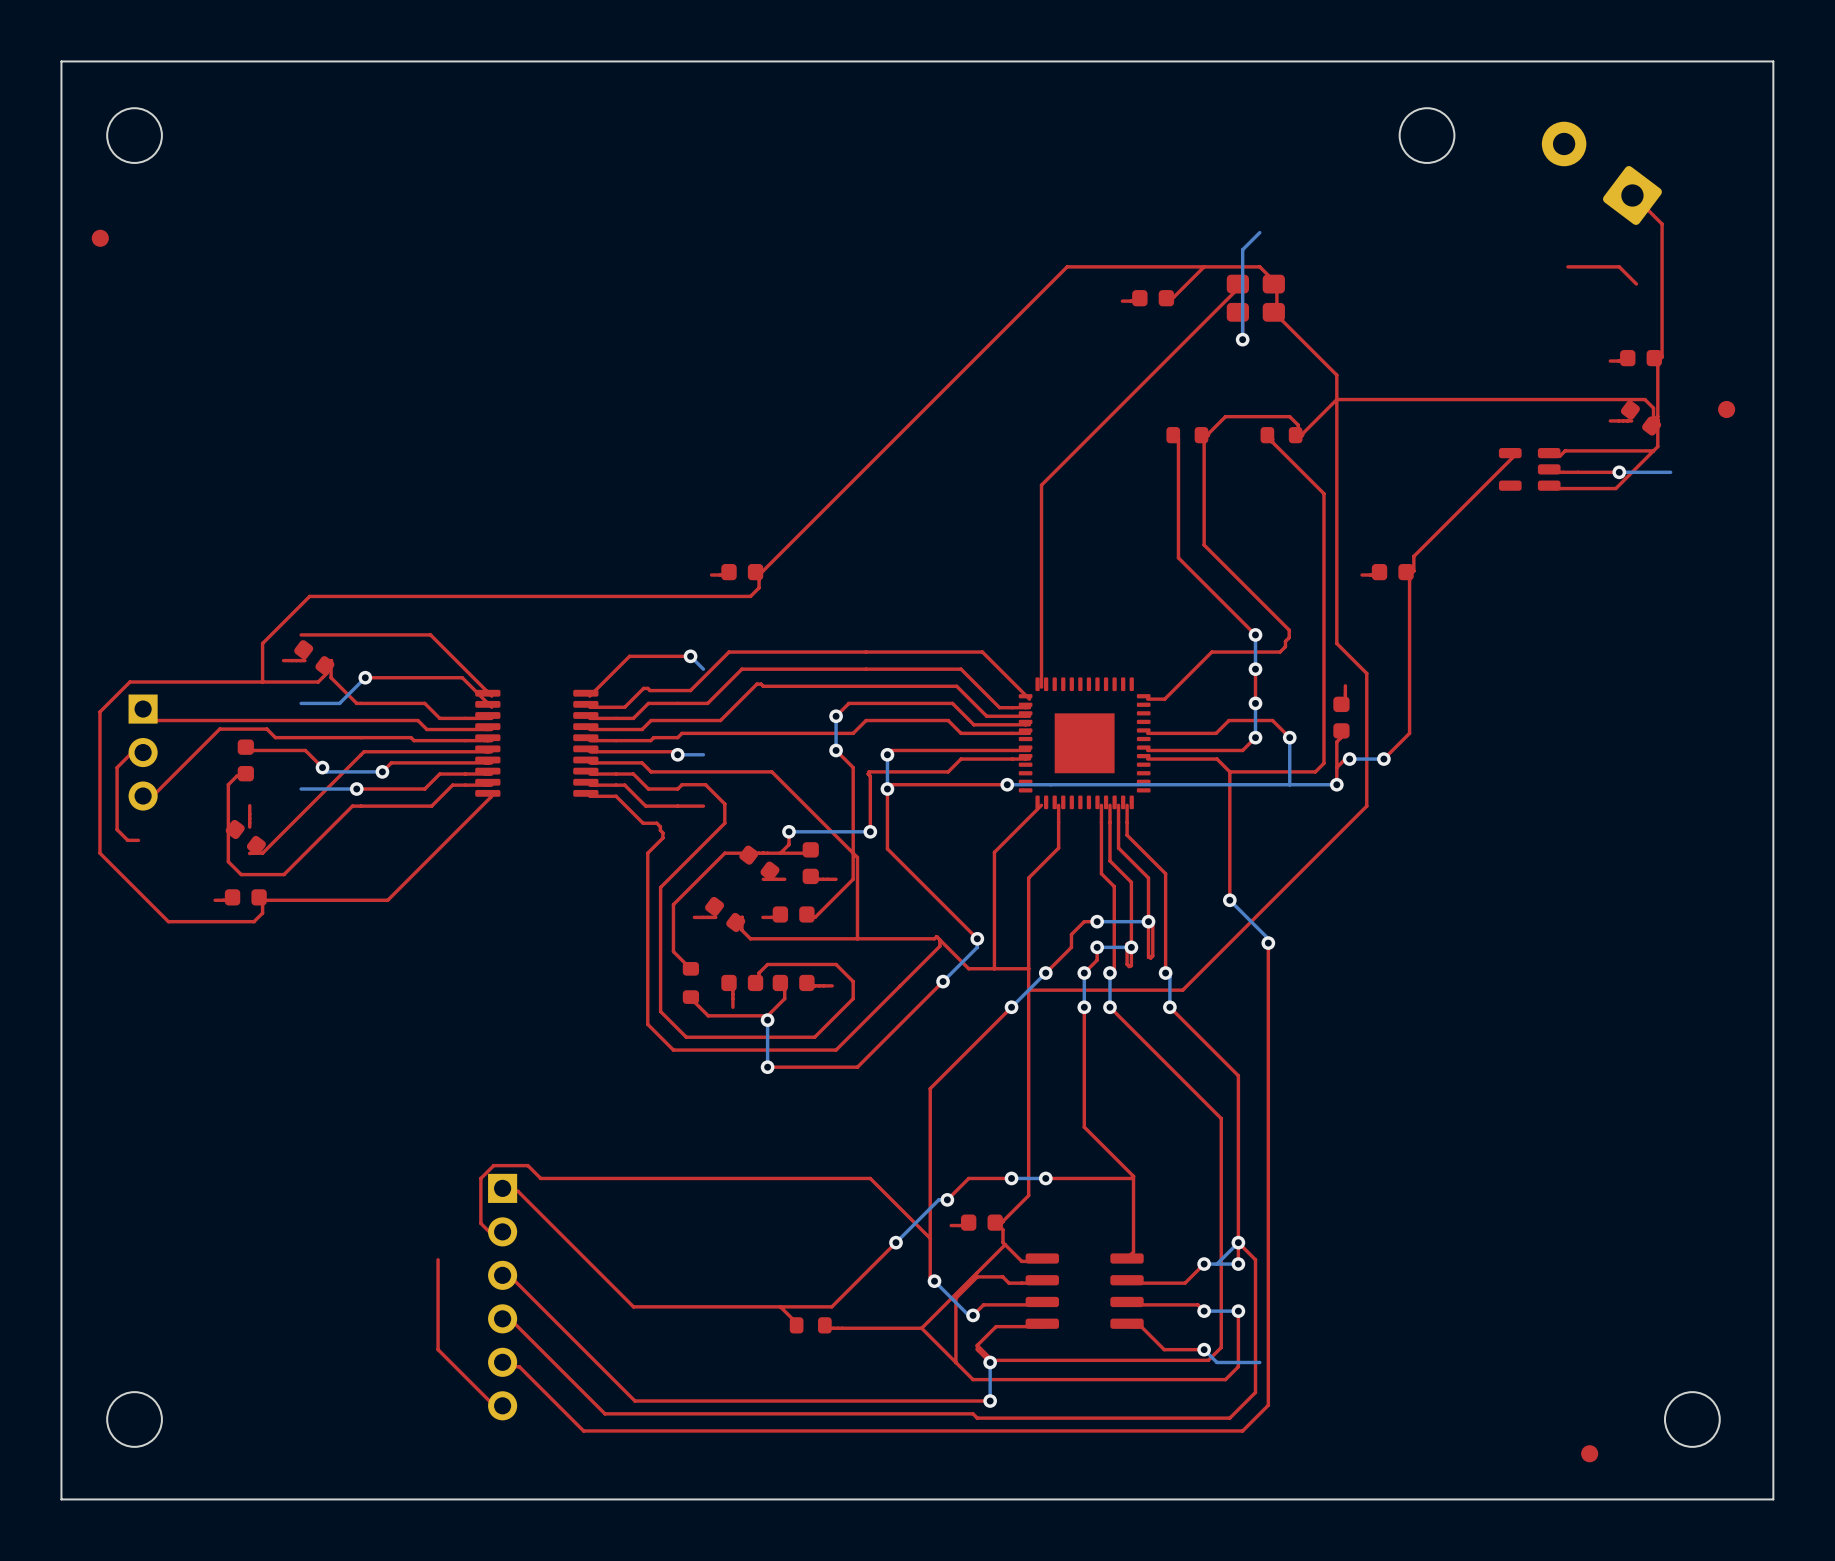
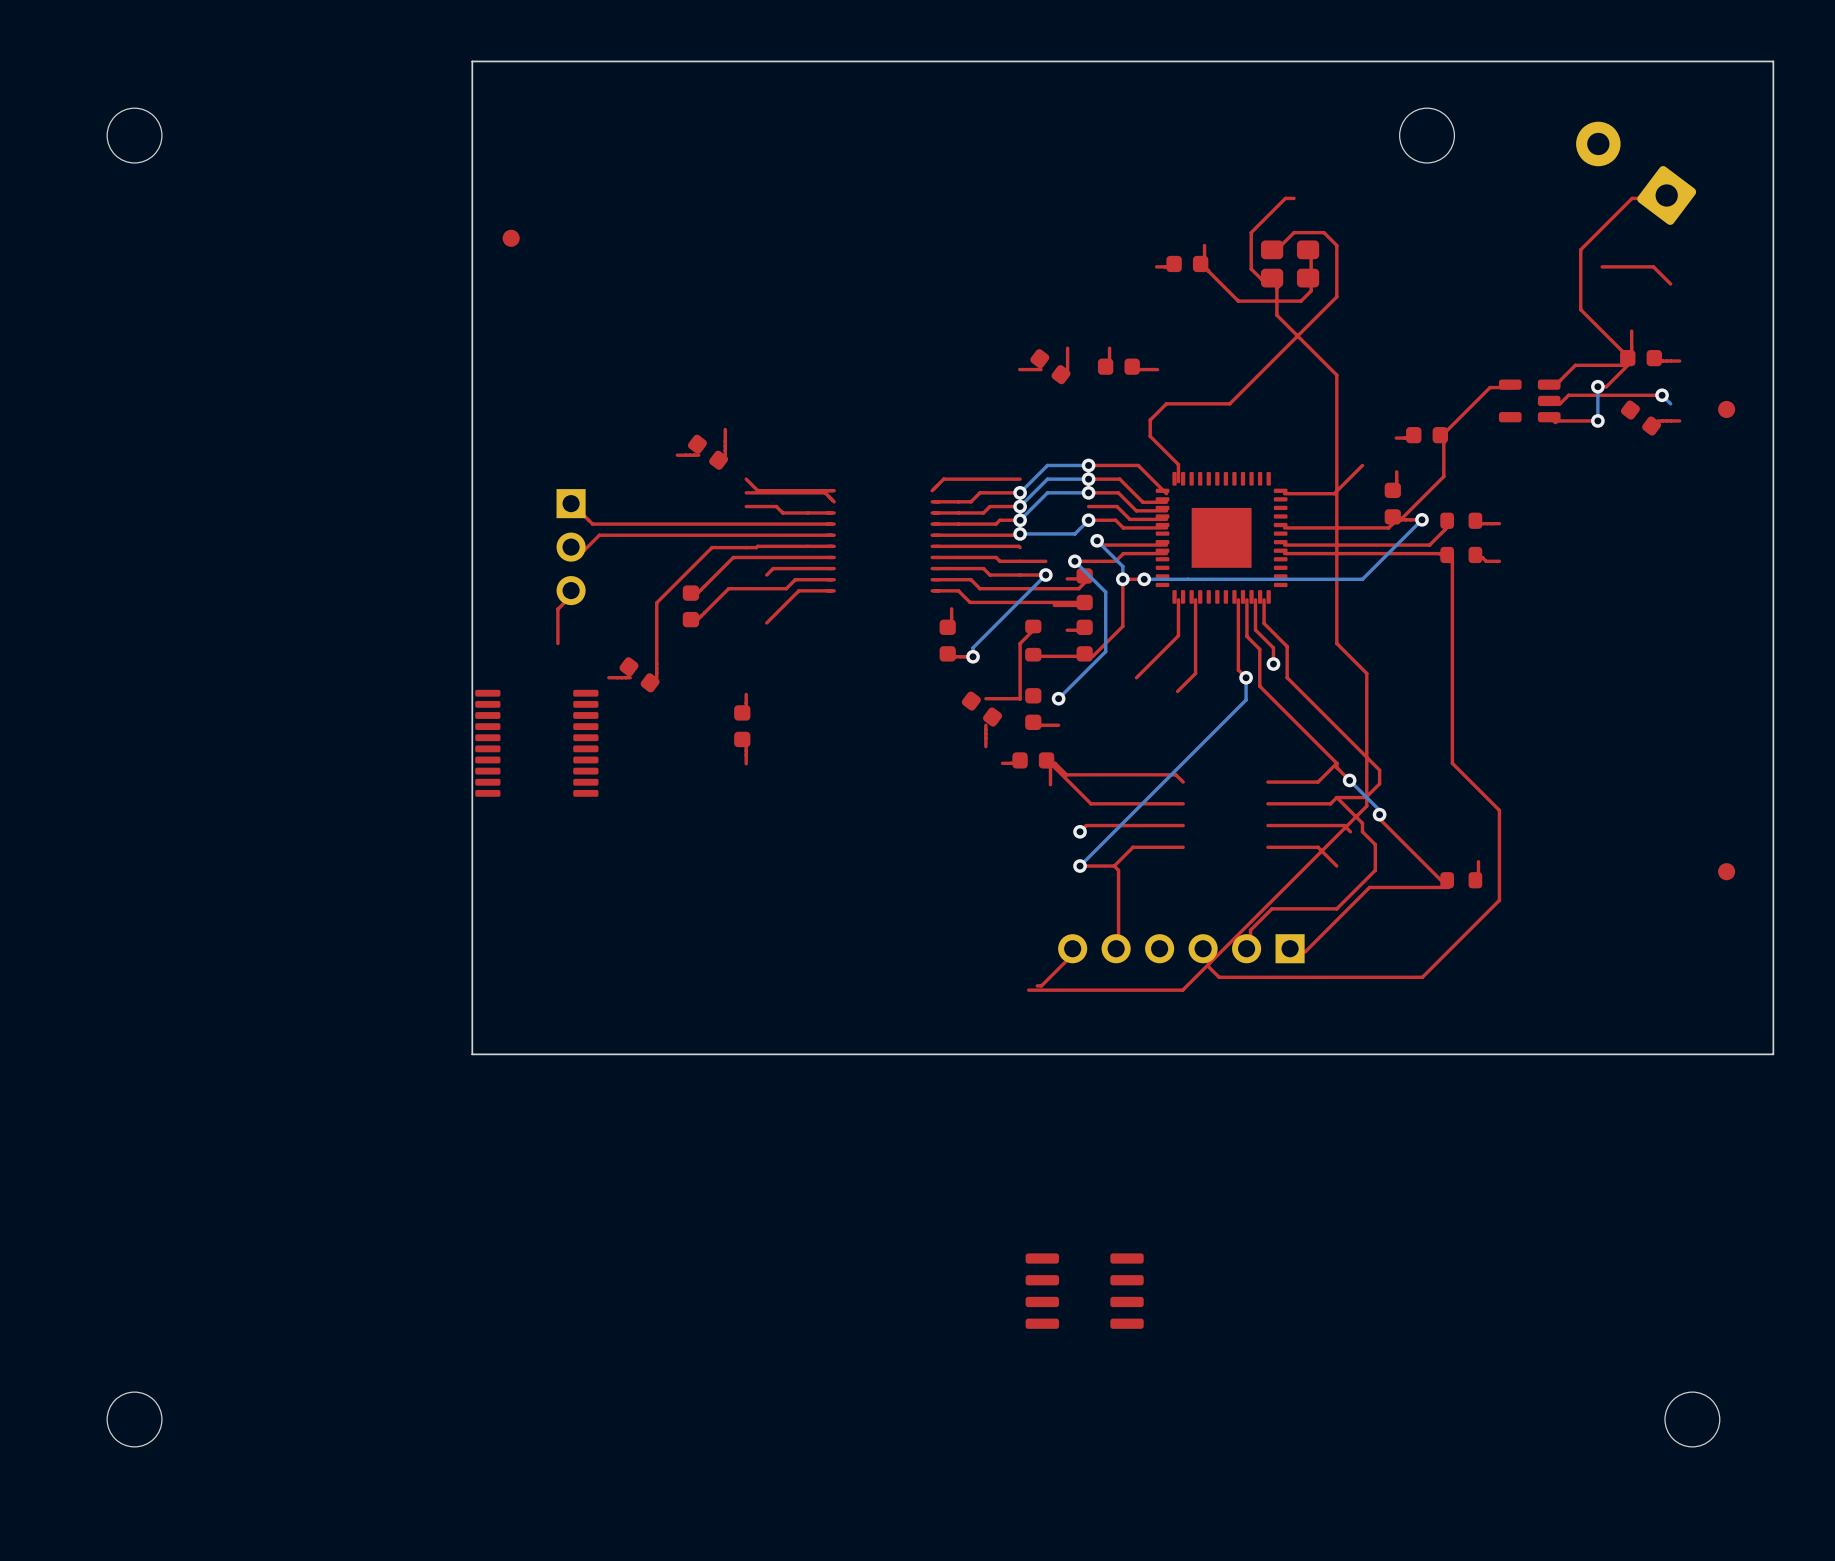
board edge: (472, 61) (61, 61) (61, 1499) (1773, 1499) (1773, 1054) -> (472, 61) (472, 1054) (1773, 1054)
part position: (1601, 173) -> (1636, 173)
top track: (1636, 198) (1662, 224) (1662, 357) (1658, 361) (1657, 365) (1658, 420) -> none
top track: none -> (1670, 198) (1632, 198) (1580, 249) (1580, 309) (1631, 361)
bottom track: (1259, 232) (1242, 249) (1242, 339) -> none
part position: (100, 238) -> (511, 238)
top track: none -> (1204, 245) (1204, 266) (1238, 301) (1301, 301) (1311, 291) (1311, 252)
part: none -> (1187, 263)
top track: (1156, 266) (1067, 266) (759, 574) (759, 587) (750, 596) (309, 596) (262, 643) (262, 682) -> none
top track: (1178, 266) (1259, 266) (1272, 279) -> (1294, 198) (1285, 198) (1251, 232) (1251, 269) (1261, 279) (1272, 279)
top track: (1204, 266) (1170, 301) -> none
top track: (1602, 266) (1567, 266) -> none
top track: (1619, 266) (1636, 283) -> (1619, 266) (1653, 266) (1670, 283)
top track: (1241, 286) (1239, 286) (1041, 485) (1041, 687) -> none
part: (1153, 298) -> none
part position: (1255, 298) -> (1290, 263)
top track: (1143, 301) (1122, 301) -> (1157, 369) (1136, 369)
top track: none -> (1631, 331) (1631, 361) (1606, 386) (1597, 386)
via: (1242, 339) -> none
top track: none -> (1067, 348) (1067, 369)
top track: none -> (1109, 348) (1109, 369)
top track: (1627, 361) (1610, 361) -> (1627, 361) (1623, 365) (1575, 365) (1553, 387)
part: none -> (1050, 366)
part: none -> (1118, 366)
top track: none -> (1041, 369) (1019, 369)
via: none -> (1597, 386)
top track: none -> (1514, 387) (1490, 387) (1443, 433) (1443, 476) (1401, 519) (1397, 519) (1388, 527) (1284, 527)
top track: none -> (1662, 395) (1568, 395) (1560, 403) (1553, 403)
bottom track: none -> (1662, 395) (1670, 403)
via: none -> (1662, 395)
top track: none -> (1553, 420) (1555, 422) (1557, 420) (1597, 420)
via: none -> (1597, 420)
top track: (1631, 420) (1610, 420) -> (1679, 361) (1658, 361)
top track: (1658, 420) (1657, 446) (1615, 488) (1553, 488) -> (1658, 420) (1679, 420)
top track: (1658, 420) (1653, 416) (1653, 408) (1644, 399) (1336, 399) (1301, 436) (1298, 433) (1298, 425) (1289, 416) (1225, 416) (1204, 439) (1204, 545) (1289, 630) (1289, 637) (1285, 641) (1285, 646) (1280, 652) (1211, 652) (1164, 699) (1147, 699) -> none
top track: none -> (725, 429) (725, 455)
part: (1187, 435) -> none
part: (1281, 435) -> none
part: none -> (1427, 435)
top track: (1177, 438) (1178, 464) -> (1276, 252) (1294, 232) (1323, 232) (1336, 245) (1336, 296) (1229, 403) (1166, 403) (1150, 420) (1150, 436) (1178, 464)
top track: (1271, 438) (1272, 442) (1323, 493) (1323, 763) (1315, 771) (1229, 771) -> none
top track: (1653, 450) (1565, 450) (1560, 456) (1553, 456) -> none
part: none -> (708, 452)
top track: (1514, 456) (1413, 556) (1413, 571) (1410, 575) (1409, 579) (1409, 733) (1383, 759) -> none
top track: none -> (1088, 465) (1138, 465) (1166, 493)
bottom track: none -> (1088, 465) (1047, 465) (1020, 492)
via: none -> (1088, 465)
top track: none -> (1362, 465) (1334, 493) (1284, 493)
part position: (1529, 469) -> (1529, 400)
top track: (1619, 472) (1553, 472) -> none
via: (1619, 472) -> none
bottom track: (1670, 472) (1619, 472) -> none
top track: none -> (746, 479) (757, 490) (834, 490)
top track: none -> (1020, 479) (943, 479) (932, 490)
top track: none -> (1088, 479) (1119, 479) (1142, 502) (1166, 502)
bottom track: none -> (1088, 479) (1047, 479) (1020, 506)
via: none -> (1088, 479)
top track: (1178, 481) (1178, 557) (1255, 634) -> none
top track: none -> (746, 492) (825, 492) (834, 501)
top track: none -> (1020, 492) (979, 492) (971, 501) (932, 501)
via: none -> (1020, 492)
top track: none -> (1088, 492) (1118, 492) (1136, 510) (1166, 510)
bottom track: none -> (1088, 492) (1047, 492) (1020, 520)
via: none -> (1088, 492)
top track: none -> (575, 506) (592, 524) (834, 524)
top track: none -> (746, 506) (776, 506) (782, 512) (834, 512)
top track: none -> (1020, 506) (989, 506) (983, 512) (932, 512)
via: none -> (1020, 506)
top track: none -> (1088, 506) (1117, 506) (1129, 519) (1166, 519)
top track: none -> (1421, 519) (1396, 519)
bottom track: none -> (1421, 519) (1362, 579) (1144, 579)
via: none -> (1421, 519)
top track: none -> (1020, 520) (999, 520) (996, 524) (932, 524)
via: none -> (1020, 520)
top track: none -> (1088, 520) (1115, 520) (1123, 527) (1166, 527)
bottom track: none -> (1088, 520) (1074, 533) (1020, 533)
via: none -> (1088, 520)
part: none -> (1461, 520)
top track: none -> (1451, 523) (1429, 545) (1284, 545)
top track: none -> (1499, 523) (1479, 523)
top track: none -> (1020, 533) (932, 535)
via: none -> (1020, 533)
top track: none -> (834, 535) (599, 535) (584, 550) (575, 550)
top track: none -> (1097, 540) (1101, 545) (1166, 545)
bottom track: none -> (1097, 540) (1122, 566) (1122, 579)
via: none -> (1097, 540)
top track: none -> (834, 546) (711, 547) (656, 602) (656, 677)
top track: none -> (932, 546) (1020, 547)
part: none -> (571, 547)
top track: none -> (1166, 553) (1123, 553) (1115, 561) (1074, 561)
top track: none -> (1284, 553) (1439, 553) (1447, 561) (1451, 557) (1452, 559) (1452, 763) (1499, 810) (1499, 900) (1422, 977) (1219, 977) (1208, 966) (1207, 951)
part: none -> (1461, 554)
top track: none -> (834, 557) (733, 557) (694, 595)
top track: none -> (932, 557) (996, 557) (999, 561) (1045, 561)
top track: none -> (1479, 557) (1482, 557) (1486, 561) (1499, 561)
bottom track: none -> (1074, 561) (1105, 592) (1105, 651) (1058, 698)
via: none -> (1074, 561)
top track: none -> (834, 568) (773, 568) (766, 575)
top track: none -> (932, 568) (983, 568) (989, 575) (1045, 575)
part rotation: 0° (742, 572) -> 90° clockwise (690, 606)
part position: (742, 572) -> (690, 606)
part rotation: 0° (1392, 572) -> 90° clockwise (1392, 503)
part position: (1392, 572) -> (1392, 503)
top track: (732, 575) (711, 575) -> (698, 455) (677, 455)
bottom track: none -> (1045, 575) (973, 647) (973, 656)
via: none -> (1045, 575)
top track: (1383, 575) (1362, 575) -> (1417, 438) (1396, 438)
top track: none -> (1067, 578) (1084, 578) (1086, 580) (1078, 588) (979, 588) (971, 579) (932, 579)
top track: none -> (834, 579) (795, 579) (786, 588) (728, 588) (694, 622)
via: none -> (1122, 579)
top track: none -> (1144, 579) (1122, 579) (1122, 626) (1092, 656) (1037, 657)
via: none -> (1144, 579)
part: none -> (1084, 589)
top track: none -> (834, 590) (798, 590) (766, 622)
top track: none -> (932, 590) (958, 590) (970, 602) (1085, 602) (1085, 605) (1054, 605)
top track: none -> (575, 593) (557, 609) (557, 643)
top track: none -> (1178, 599) (1178, 635) (1136, 677)
top track: none -> (1195, 599) (1195, 673) (1177, 691)
top track: none -> (1238, 599) (1238, 670) (1246, 677)
top track: none -> (1246, 599) (1246, 636) (1259, 649) (1259, 686) (1336, 763) (1318, 782) (1267, 782)
top track: none -> (1255, 599) (1255, 629) (1273, 647) (1273, 664)
top track: none -> (1264, 599) (1264, 623) (1287, 646) (1287, 677) (1379, 770) (1379, 783) (1365, 797) (1336, 797)
top track: none -> (951, 608) (951, 630)
top track: none -> (1037, 629) (1034, 629) (1020, 643) (1020, 699) (985, 698)
top track: none -> (1088, 630) (1067, 630)
top track: (301, 634) (430, 634) (491, 696) -> none
bottom track: (1255, 634) (1255, 669) -> (1597, 386) (1597, 420)
via: (1255, 634) -> none
part: none -> (947, 640)
part: none -> (1033, 640)
part: none -> (1084, 640)
top track: (690, 656) (629, 656) (589, 696) -> none
bottom track: (690, 656) (703, 669) -> none
via: (690, 656) -> none
via: none -> (973, 656)
part: (314, 657) -> none
top track: (304, 660) (283, 660) -> none
via: none -> (1273, 664)
top track: (1255, 669) (1255, 703) -> none
via position: (1255, 669) -> (1246, 677)
part: none -> (639, 674)
top track: (365, 677) (462, 677) (491, 707) -> none
bottom track: (365, 677) (339, 703) (301, 703) -> none
via: (365, 677) -> none
bottom track: none -> (1246, 677) (1246, 699) (1080, 866)
top track: (1345, 685) (1345, 707) -> (1396, 471) (1396, 493)
top track: none -> (746, 694) (746, 715)
via: none -> (1058, 698)
top track: (1029, 699) (982, 652) (729, 652) (690, 690) (650, 690) (643, 688) (624, 707) (589, 707) -> none
bottom track: (1255, 703) (1255, 737) -> none
via: (1255, 703) -> none
top track: (1029, 707) (999, 707) (961, 669) (741, 669) (707, 703) (648, 703) (633, 718) (589, 718) -> none
part: none -> (981, 709)
part: none -> (1033, 709)
top track: (147, 711) (155, 720) (417, 720) (426, 729) (491, 729) -> none
top track: (836, 716) (848, 703) (952, 703) (973, 724) (1029, 724) -> none
bottom track: (836, 716) (836, 750) -> none
via: (836, 716) -> none
top track: (1029, 716) (986, 716) (956, 686) (763, 686) (756, 684) (720, 720) (651, 720) (642, 729) (589, 729) -> none
part: (1341, 717) -> none
top track: (491, 718) (439, 718) (424, 703) (356, 703) (331, 677) (331, 660) (326, 664) (326, 673) (318, 682) (129, 682) (99, 711) (99, 853) (168, 921) (254, 921) (262, 913) (263, 900) (387, 900) (491, 796) -> none
top track: none -> (985, 725) (985, 746)
part: none -> (742, 726)
top track: (1029, 733) (961, 733) (948, 720) (866, 720) (853, 733) (682, 733) (677, 737) (653, 737) (650, 740) (589, 740) -> none
top track: (1147, 733) (1216, 733) (1228, 720) (1272, 720) (1289, 737) -> none
top track: (1345, 733) (1336, 741) (1336, 763) -> none
top track: (1255, 737) (1242, 750) (1147, 750) -> none
via: (1255, 737) -> none
bottom track: (1289, 737) (1289, 784) -> none
via: (1289, 737) -> none
top track: (491, 740) (414, 740) (411, 737) (275, 737) (266, 729) (219, 729) (151, 797) (147, 798) -> none
part position: (1084, 743) -> (1221, 537)
top track: (249, 750) (305, 750) (322, 767) -> none
top track: (836, 750) (853, 767) (853, 879) (815, 917) (810, 917) -> none
via: (836, 750) -> none
top track: (1029, 750) (891, 750) (887, 754) -> none
top track: (491, 751) (364, 751) (262, 853) (249, 853) -> none
top track: (589, 751) (674, 751) (677, 754) -> none
part: (143, 752) -> none
via: (677, 754) -> none
bottom track: (703, 754) (677, 754) -> none
bottom track: (887, 754) (887, 789) -> none
via: (887, 754) -> none
top track: (147, 755) (129, 754) (117, 767) (117, 829) (127, 840) (138, 840) -> none
top track: (1029, 759) (961, 759) (948, 771) (869, 771) (870, 831) -> none
top track: (1147, 759) (1216, 759) (1229, 771) -> none
top track: (1349, 759) (1345, 759) (1336, 767) (1336, 784) -> none
via: (1349, 759) -> none
bottom track: (1383, 759) (1349, 759) -> none
via: (1383, 759) -> none
part: (245, 760) -> none
part: none -> (1033, 760)
top track: (491, 762) (391, 762) (382, 771) -> none
top track: (589, 762) (642, 762) (651, 771) (771, 771) (857, 857) (857, 938) -> none
top track: none -> (1050, 763) (1055, 763) (1066, 774) (1175, 774) (1183, 782)
top track: none -> (1050, 763) (1050, 784)
top track: none -> (1050, 763) (1090, 803) (1183, 803)
bottom track: (322, 767) (326, 771) (382, 771) -> none
via: (322, 767) -> none
top track: none -> (1336, 767) (1349, 780)
via: (382, 771) -> none
top track: (1229, 771) (1229, 900) -> none
top track: (491, 774) (439, 774) (424, 789) (356, 789) -> none
top track: (589, 774) (633, 774) (648, 789) (677, 789) (682, 784) (705, 784) (724, 803) (724, 823) (660, 887) (660, 1011) (686, 1037) (814, 1037) (853, 998) (853, 981) (836, 964) (767, 964) (759, 973) (759, 985) -> none
top track: (249, 776) (236, 776) (228, 784) (228, 861) (241, 874) (283, 874) (352, 806) (431, 806) (452, 785) (491, 785) -> none
bottom track: none -> (1349, 780) (1379, 810) (1379, 814)
top track: (1007, 784) (891, 784) (887, 789) (887, 848) (977, 938) -> none
via: (1007, 784) -> none
bottom track: (1336, 784) (1007, 784) -> none
via position: (1336, 784) -> (1349, 780)
top track: (589, 785) (624, 785) (645, 806) (703, 806) -> none
bottom track: (356, 789) (301, 789) -> none
via: (356, 789) -> none
via: (887, 789) -> none
top track: (589, 796) (616, 796) (643, 823) (656, 823) (662, 832) (662, 838) (647, 853) (647, 1024) (673, 1050) (836, 1050) (939, 946) (939, 939) -> none
top track: none -> (1336, 797) (1362, 823) (1362, 831) (1375, 844) (1375, 870) (1336, 908) (1271, 908) (1250, 930) (1250, 951)
top track: none -> (1336, 797) (1330, 803) (1267, 803)
top track: (249, 805) (249, 827) -> none
top track: (1041, 805) (994, 852) (994, 968) -> none
top track: (1058, 805) (1058, 848) (1028, 878) (1028, 1195) (999, 1225) -> none
top track: (1101, 805) (1101, 873) (1114, 886) (1114, 968) (1109, 973) -> none
top track: (1109, 805) (1109, 860) (1131, 882) (1131, 965) (1129, 966) (1127, 964) (1127, 943) (1127, 943) (1131, 947) -> none
top track: (1118, 805) (1118, 848) (1148, 878) (1148, 957) (1150, 958) (1152, 955) (1152, 921) (1148, 921) -> none
top track: (1127, 805) (1127, 835) (1165, 873) (1165, 973) -> none
top track: none -> (1379, 814) (1379, 818) (1448, 887)
via: none -> (1379, 814)
top track: none -> (1183, 825) (1086, 825) (1080, 831)
top track: none -> (1267, 825) (1344, 825) (1350, 831)
top track: (789, 831) (789, 844) (780, 853) -> none
via: (789, 831) -> none
bottom track: (870, 831) (789, 831) -> none
via: (870, 831) -> none
via: none -> (1080, 831)
part: (245, 837) -> none
top track: none -> (1183, 847) (1133, 847) (1114, 866)
top track: none -> (1267, 847) (1318, 847) (1336, 866)
top track: (814, 852) (724, 853) (673, 904) (673, 951) (694, 971) -> none
top track: none -> (1478, 861) (1479, 883)
part: (759, 863) -> none
part: (810, 863) -> none
via: none -> (1080, 866)
top track: none -> (1114, 866) (1080, 866)
top track: none -> (1114, 866) (1118, 870) (1118, 950) (1120, 951)
part: none -> (1726, 871)
top track: (784, 879) (763, 879) -> (630, 677) (608, 677)
top track: (836, 879) (814, 879) -> (1023, 763) (1002, 763)
part: none -> (1461, 880)
top track: none -> (1448, 887) (1369, 887) (1305, 951) (1294, 951)
part: (245, 897) -> none
top track: (236, 900) (215, 900) -> none
bottom track: (1229, 900) (1268, 938) (1268, 943) -> none
via: (1229, 900) -> none
part: (725, 914) -> none
part: (793, 914) -> none
top track: (715, 917) (694, 917) -> none
top track: (784, 917) (762, 917) -> (973, 656) (951, 656)
top track: (737, 921) (742, 917) (741, 930) (750, 938) (934, 938) (936, 936) (968, 968) (1028, 968) -> none
top track: (1097, 921) (1084, 921) (1071, 934) (1071, 947) (1045, 973) -> none
via: (1097, 921) -> none
bottom track: (1148, 921) (1097, 921) -> none
via: (1148, 921) -> none
bottom track: (977, 938) (977, 947) (943, 981) -> none
via: (977, 938) -> none
top track: (1268, 943) (1268, 1405) (1242, 1430) (583, 1430) (519, 1366) (506, 1365) -> none
via: (1268, 943) -> none
top track: (1097, 947) (1097, 960) (1084, 973) -> none
via: (1097, 947) -> none
bottom track: (1131, 947) (1097, 947) -> none
via: (1131, 947) -> none
part: none -> (1181, 948)
top track: none -> (1076, 951) (1041, 985) (1037, 985)
bottom track: (1045, 973) (1011, 1007) -> none
via: (1045, 973) -> none
bottom track: (1084, 973) (1084, 1007) -> none
via: (1084, 973) -> none
bottom track: (1109, 973) (1109, 1007) -> none
via: (1109, 973) -> none
bottom track: (1165, 973) (1169, 977) (1169, 1007) -> none
via: (1165, 973) -> none
top track: (943, 981) (857, 1067) (767, 1067) -> none
via: (943, 981) -> none
part: (690, 982) -> none
part: (742, 982) -> none
part: (793, 982) -> none
top track: (732, 985) (732, 1007) -> (746, 742) (746, 763)
top track: (784, 985) (784, 998) (767, 1015) -> none
top track: (832, 985) (810, 985) -> (1058, 725) (1037, 725)
top track: (694, 1000) (694, 1002) (708, 1015) (767, 1015) -> none
top track: (1011, 1007) (930, 1088) (930, 1276) (934, 1281) -> none
via: (1011, 1007) -> none
top track: (1084, 1007) (1084, 1127) (1133, 1176) -> none
via: (1084, 1007) -> none
top track: (1109, 1007) (1221, 1118) (1221, 1347) (1208, 1360) (992, 1360) (977, 1345) -> none
via: (1109, 1007) -> none
top track: (1169, 1007) (1238, 1075) (1238, 1264) -> none
via: (1169, 1007) -> none
bottom track: (767, 1020) (767, 1067) -> none
via: (767, 1020) -> none
via: (767, 1067) -> none
top track: (1133, 1176) (1131, 1178) (1045, 1178) -> none
top track: (1133, 1176) (1133, 1251) (1130, 1254) (1130, 1261) -> none
top track: (1011, 1178) (968, 1178) (947, 1199) -> none
via: (1011, 1178) -> none
bottom track: (1045, 1178) (1011, 1178) -> none
via: (1045, 1178) -> none
top track: (506, 1191) (517, 1191) (633, 1306) (831, 1306) (896, 1242) -> none
bottom track: (947, 1199) (938, 1199) (896, 1242) -> none
via: (947, 1199) -> none
top track: (998, 1221) (999, 1225) (1002, 1229) (1002, 1242) (1021, 1261) (1046, 1261) -> none
part: (981, 1222) -> none
top track: (972, 1225) (951, 1225) -> none
top track: (506, 1234) (491, 1234) (480, 1223) (480, 1178) (493, 1165) (527, 1165) (540, 1178) (870, 1178) (930, 1238) -> none
via: (896, 1242) -> none
top track: (1238, 1242) (1255, 1259) (1255, 1392) (1229, 1418) (977, 1418) (973, 1413) (604, 1413) (510, 1319) (506, 1321) -> none
bottom track: (1238, 1242) (1216, 1264) -> none
via: (1238, 1242) -> none
top track: (1005, 1244) (921, 1328) -> none
top track: (438, 1259) (438, 1349) (497, 1409) (506, 1408) -> none
top track: (1204, 1264) (1185, 1283) (1130, 1283) -> none
via: (1204, 1264) -> none
bottom track: (1238, 1264) (1204, 1264) -> none
via: (1238, 1264) -> none
top track: (506, 1278) (510, 1276) (634, 1401) (990, 1401) -> none
bottom track: (934, 1281) (968, 1315) (973, 1315) -> none
via: (934, 1281) -> none
top track: (1046, 1283) (1008, 1283) (1002, 1276) (977, 1276) (955, 1298) (955, 1362) -> none
part: (502, 1297) -> none
top track: (1046, 1304) (983, 1304) (973, 1315) -> none
top track: (1130, 1304) (1197, 1304) (1204, 1311) -> none
top track: (780, 1306) (800, 1328) -> none
via: (1204, 1311) -> none
top track: (1238, 1311) (1238, 1366) (1225, 1379) (973, 1379) (921, 1328) -> none
bottom track: (1238, 1311) (1204, 1311) -> none
via: (1238, 1311) -> none
via: (973, 1315) -> none
part: (810, 1325) -> none
top track: (1046, 1326) (996, 1326) (977, 1345) -> none
top track: (1130, 1326) (1141, 1326) (1164, 1349) (1204, 1349) -> none
top track: (921, 1328) (828, 1328) -> none
top track: (977, 1345) (977, 1349) (990, 1362) -> none
bottom track: (1204, 1349) (1216, 1362) (1259, 1362) -> none
via: (1204, 1349) -> none
bottom track: (990, 1362) (990, 1401) -> none
via: (990, 1362) -> none
via: (990, 1401) -> none
part: (1589, 1453) -> none

